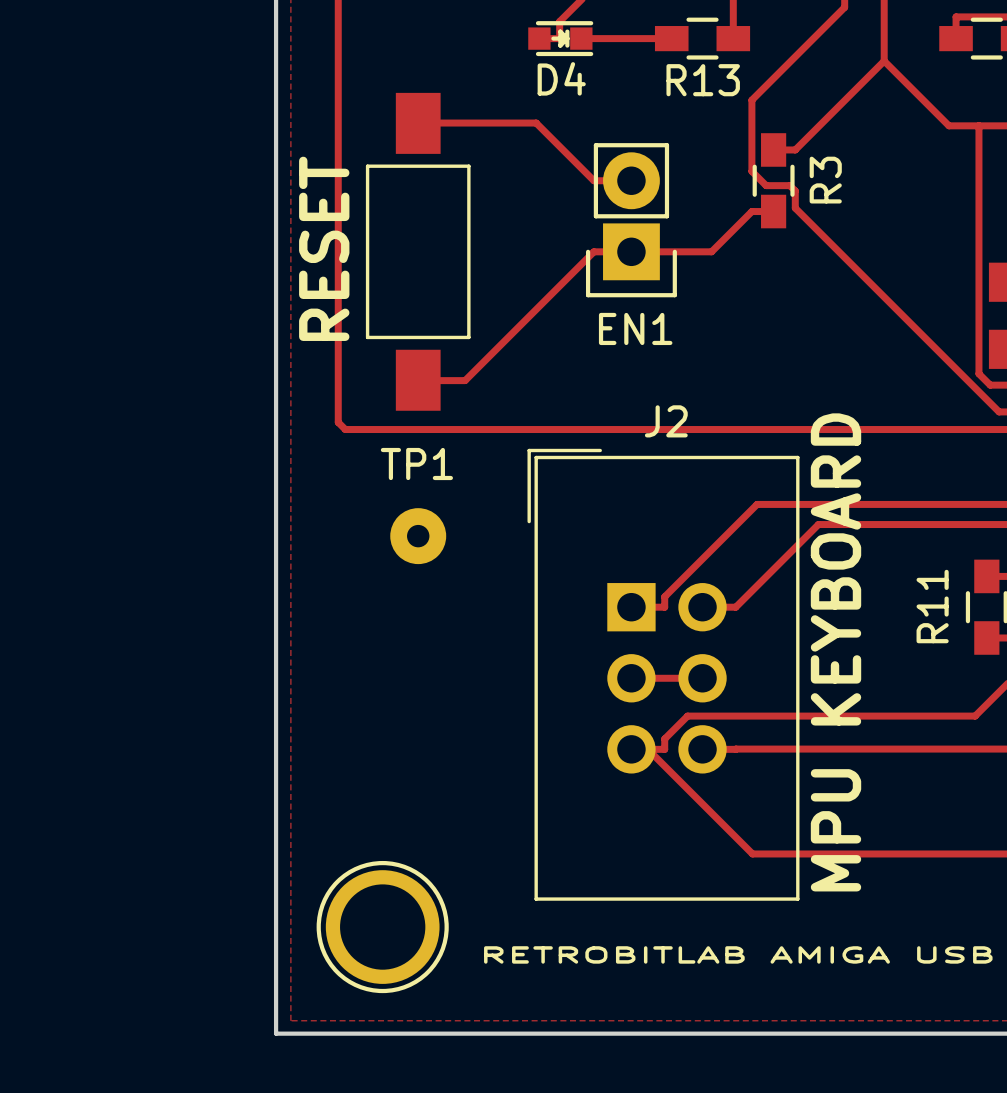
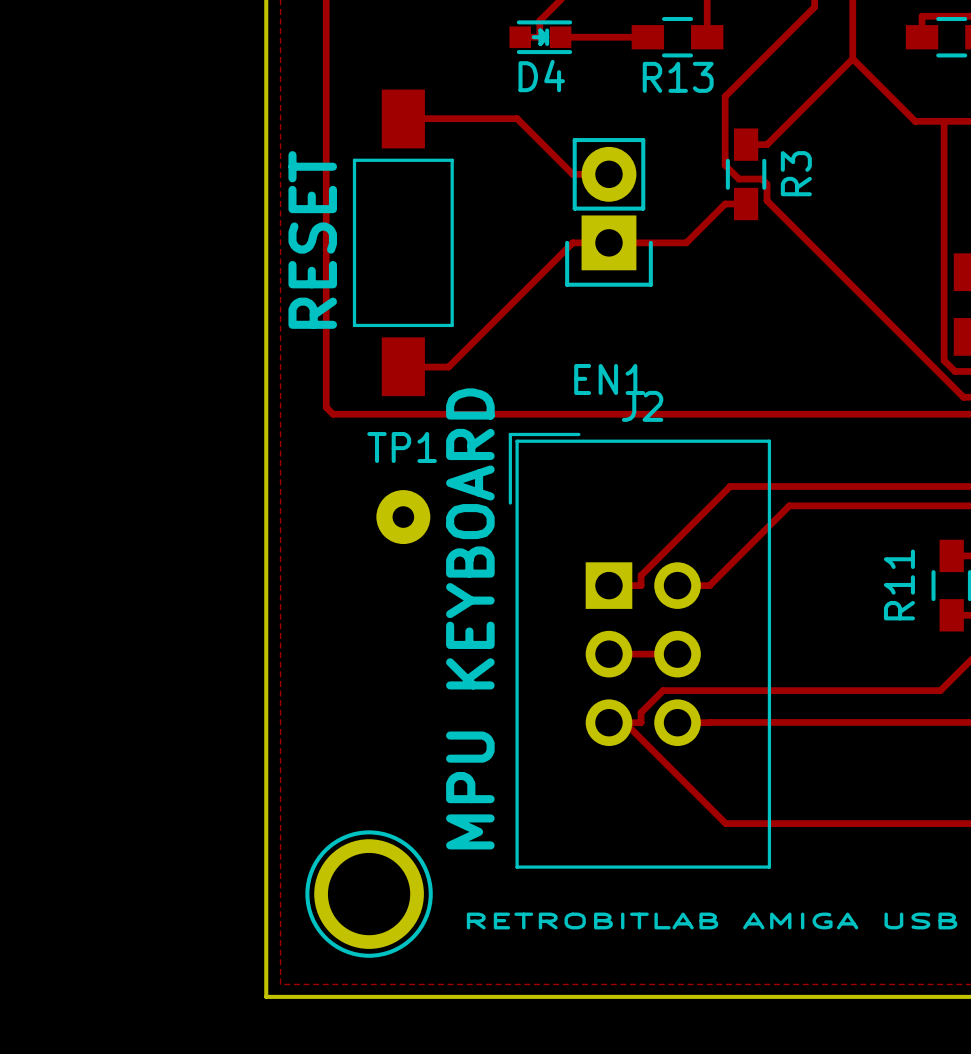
EN1 name position: EN1 (635, 328) -> EN1 (609, 379)
text position: MPU KEYBOARD (836, 652) -> MPU KEYBOARD (470, 618)

